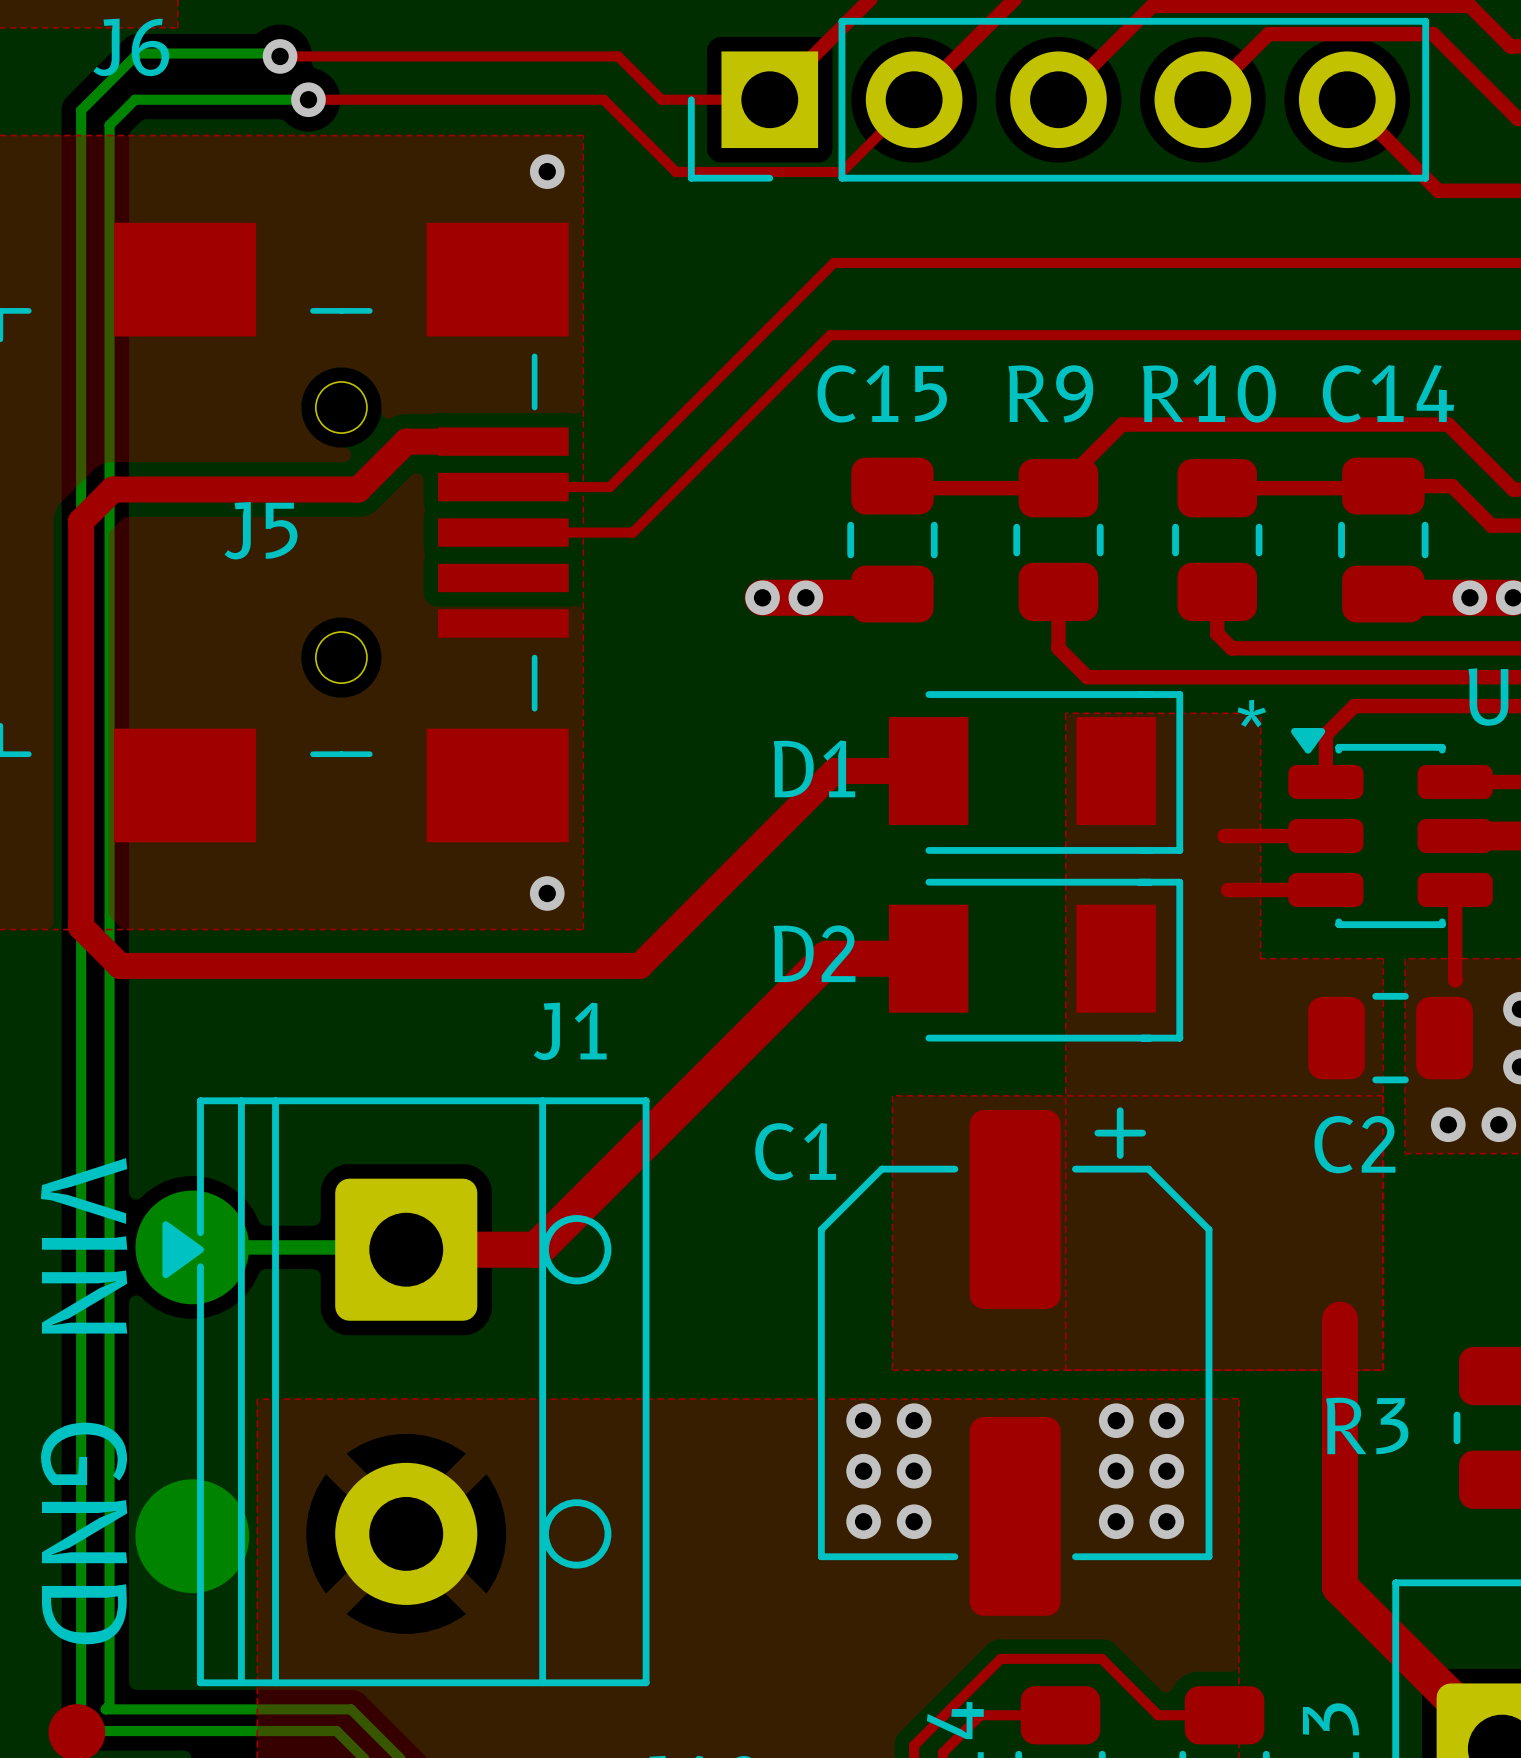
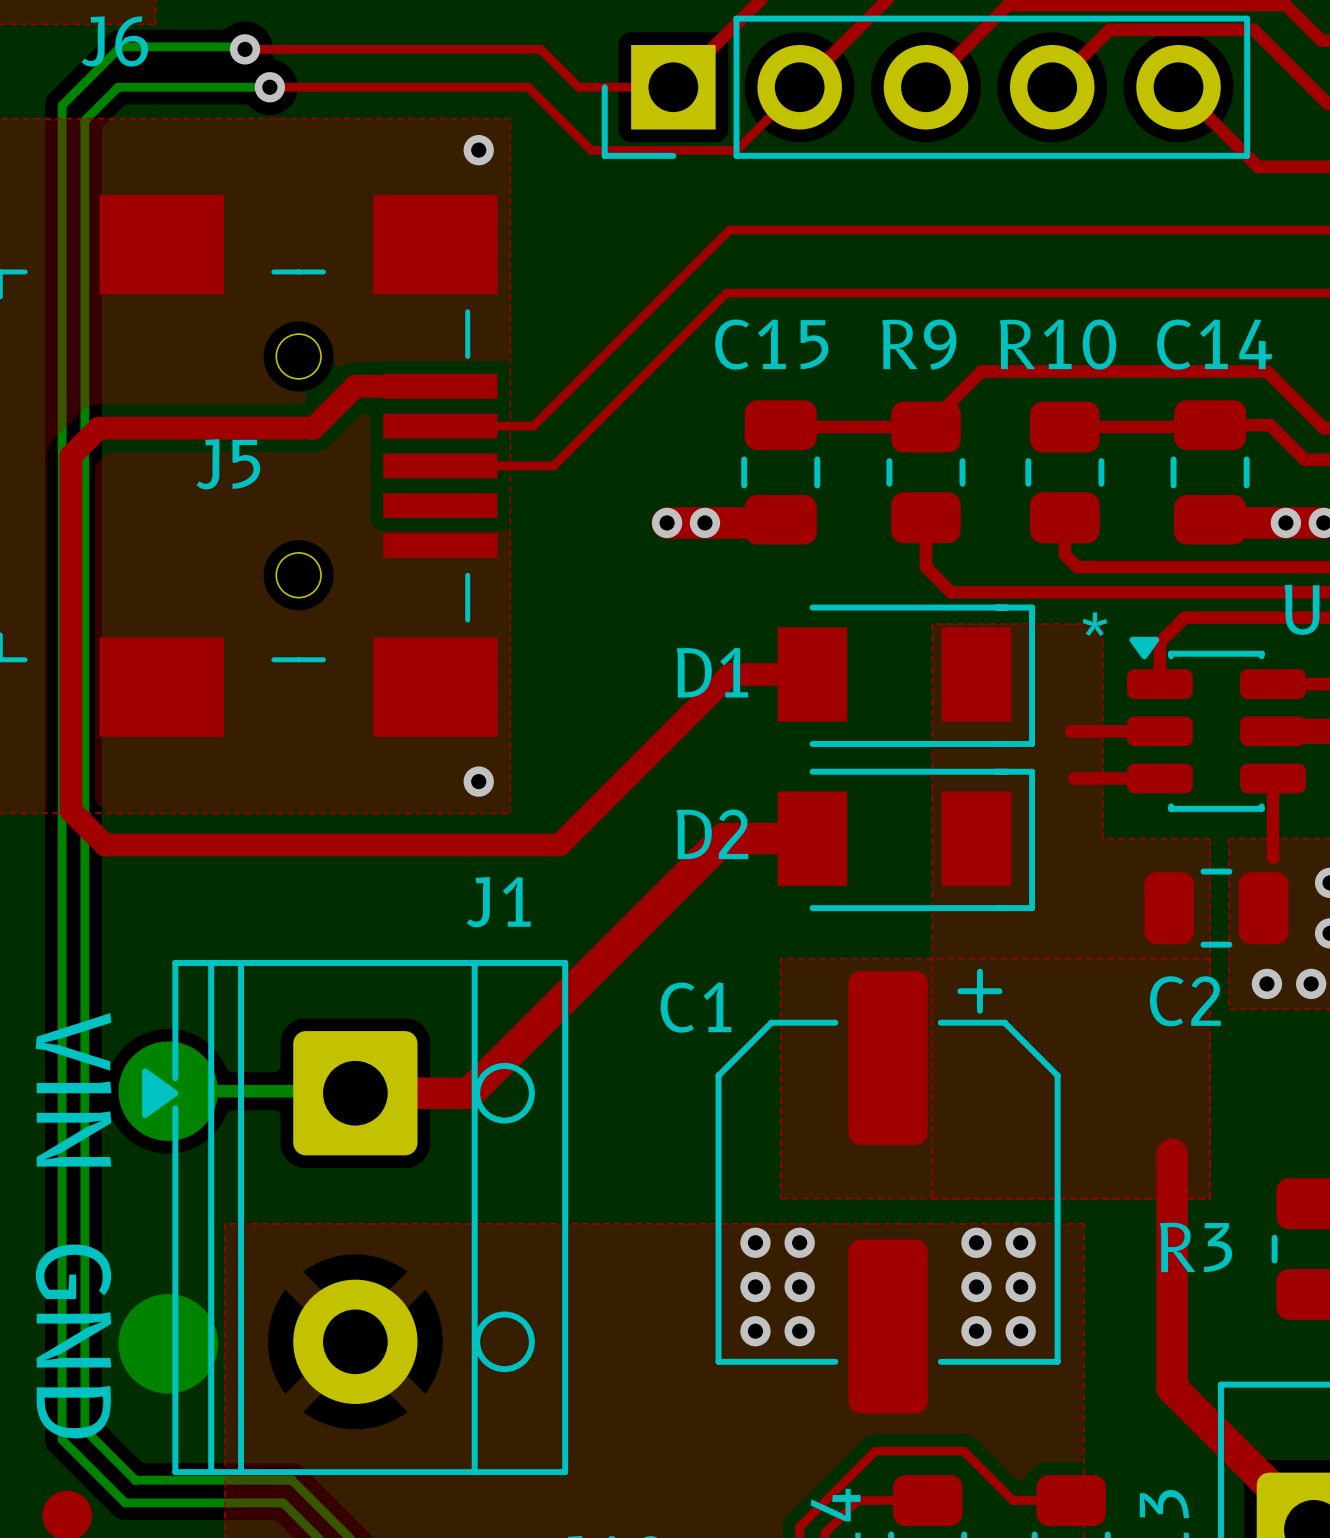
bottom track: (81, 110) (81, 1713) (98, 1731) (336, 1731) -> (70, 96) (62, 105) (62, 1439) (125, 1502) (283, 1502) (294, 1514)
bottom track: (109, 125) (109, 1705) (105, 1709) (351, 1709) -> (95, 109) (84, 120) (84, 1429) (135, 1480) (291, 1480) (307, 1495)

